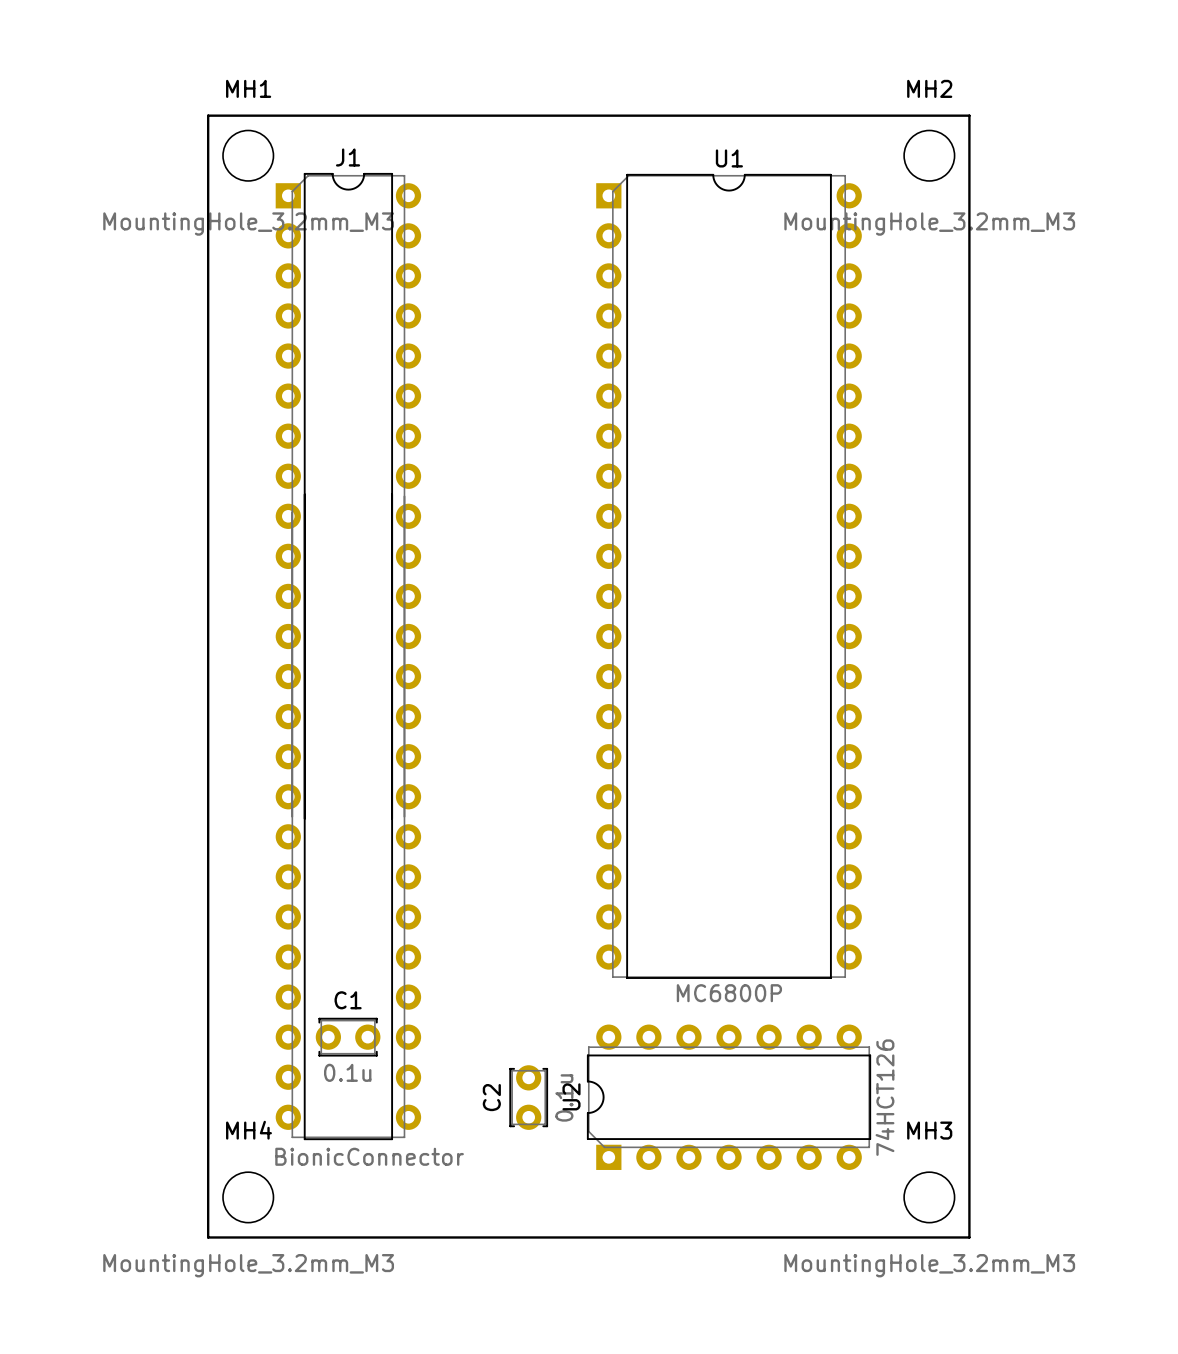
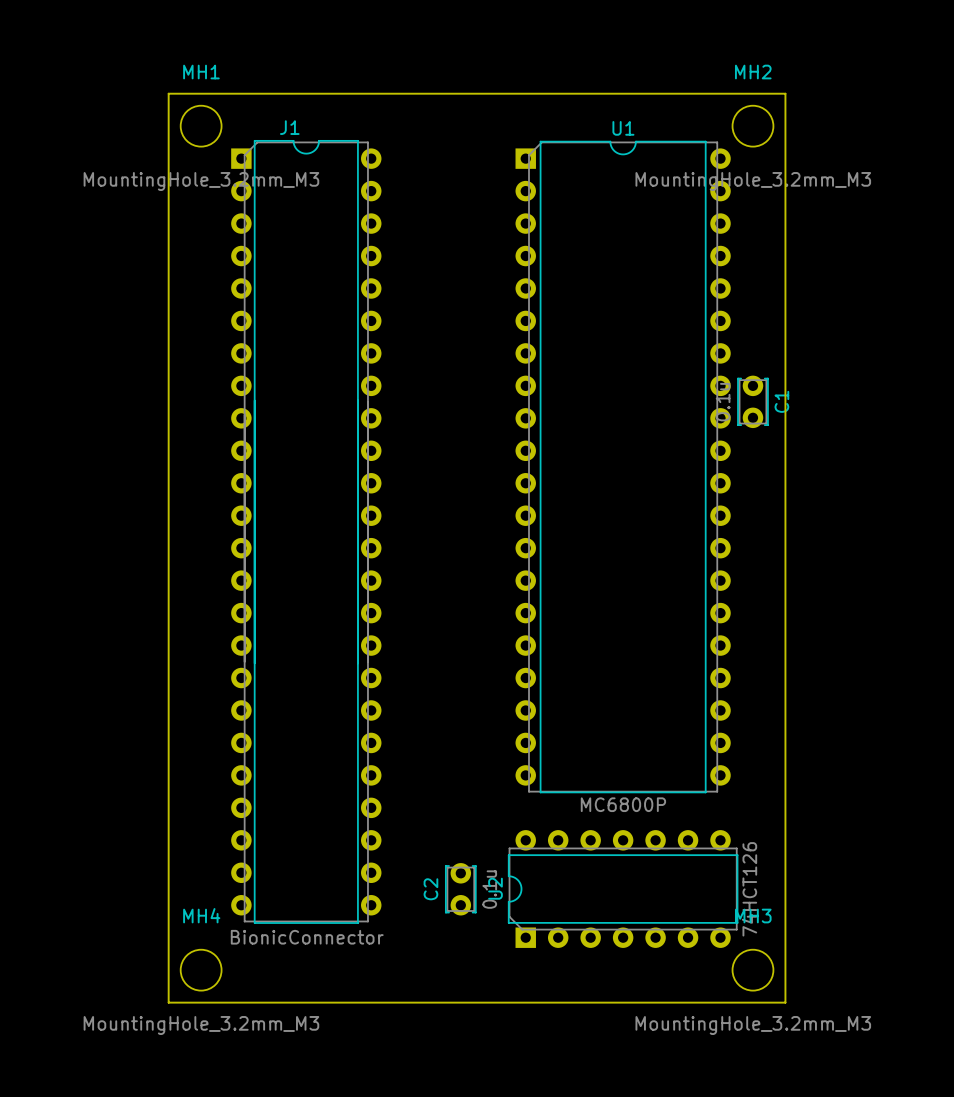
J1 footprint: [275, 172, 422, 1141] -> [231, 140, 382, 924]
U1 position: (729, 576) -> (623, 467)
C1 rotation: 0° (348, 1037) -> 90° clockwise (752, 401)
C1 position: (348, 1037) -> (752, 401)
C2 position: (528, 1097) -> (460, 889)
U2 position: (729, 1097) -> (623, 889)

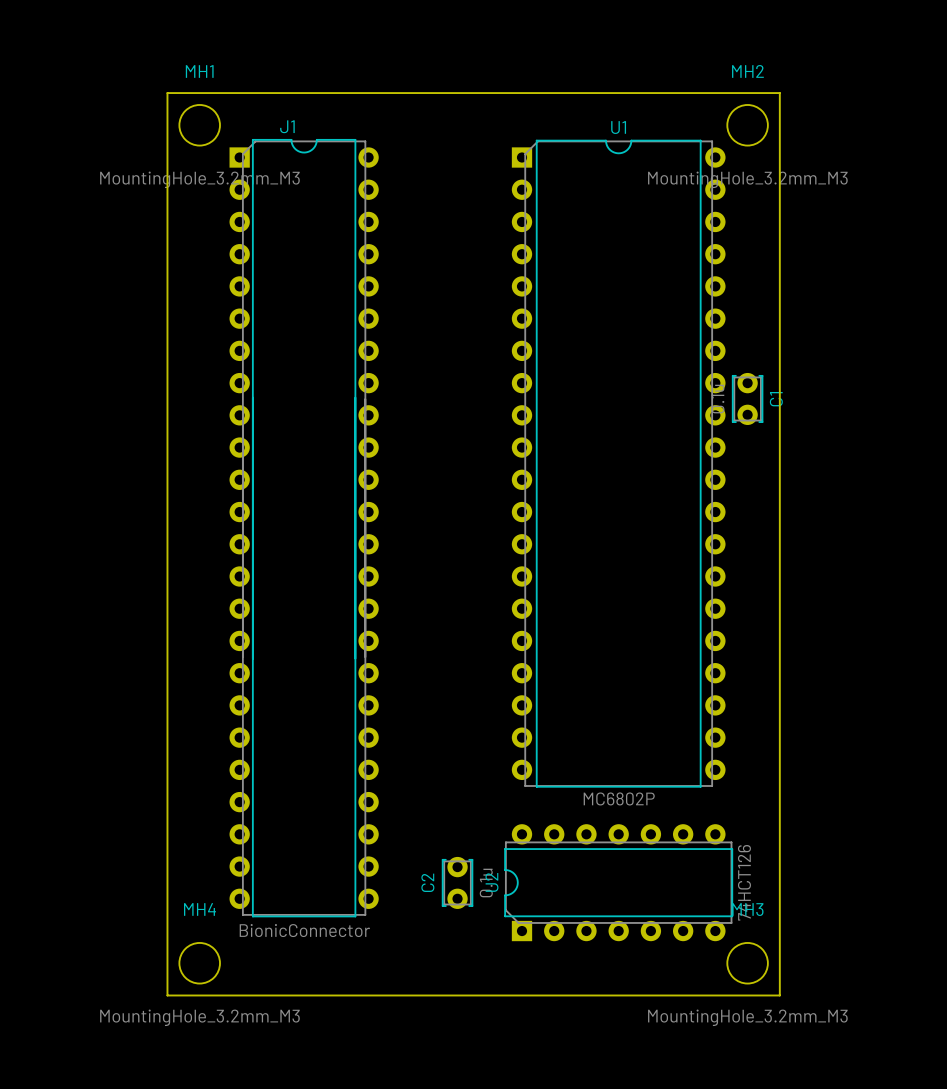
U1 value: MC6800P (623, 804) -> MC6802P (619, 798)

